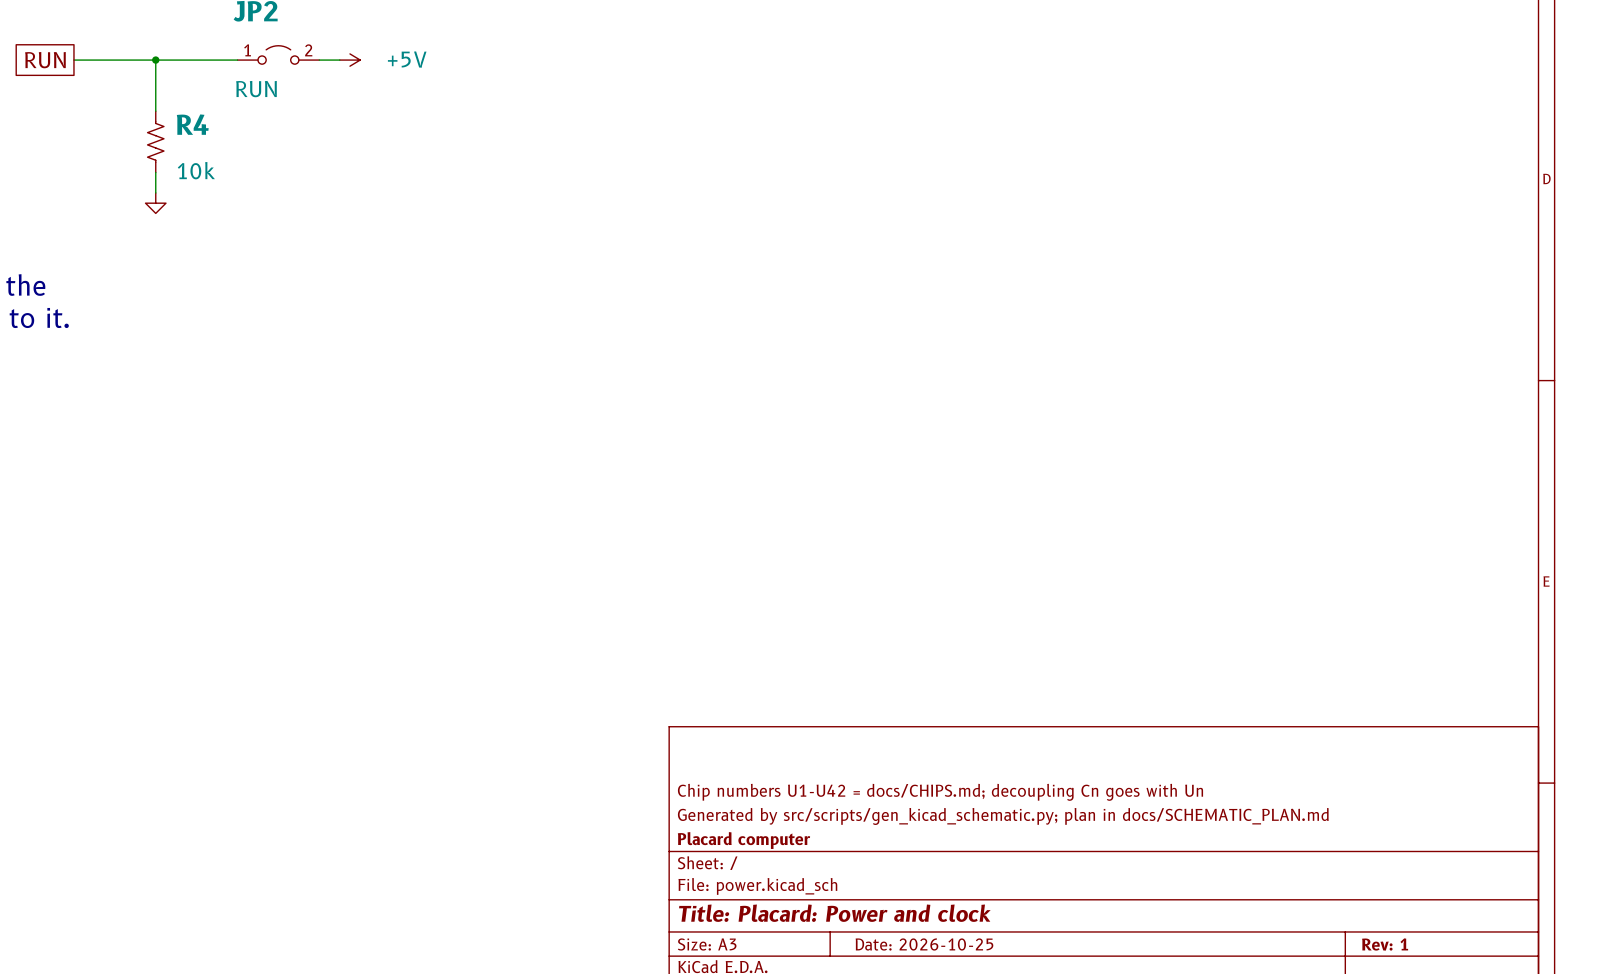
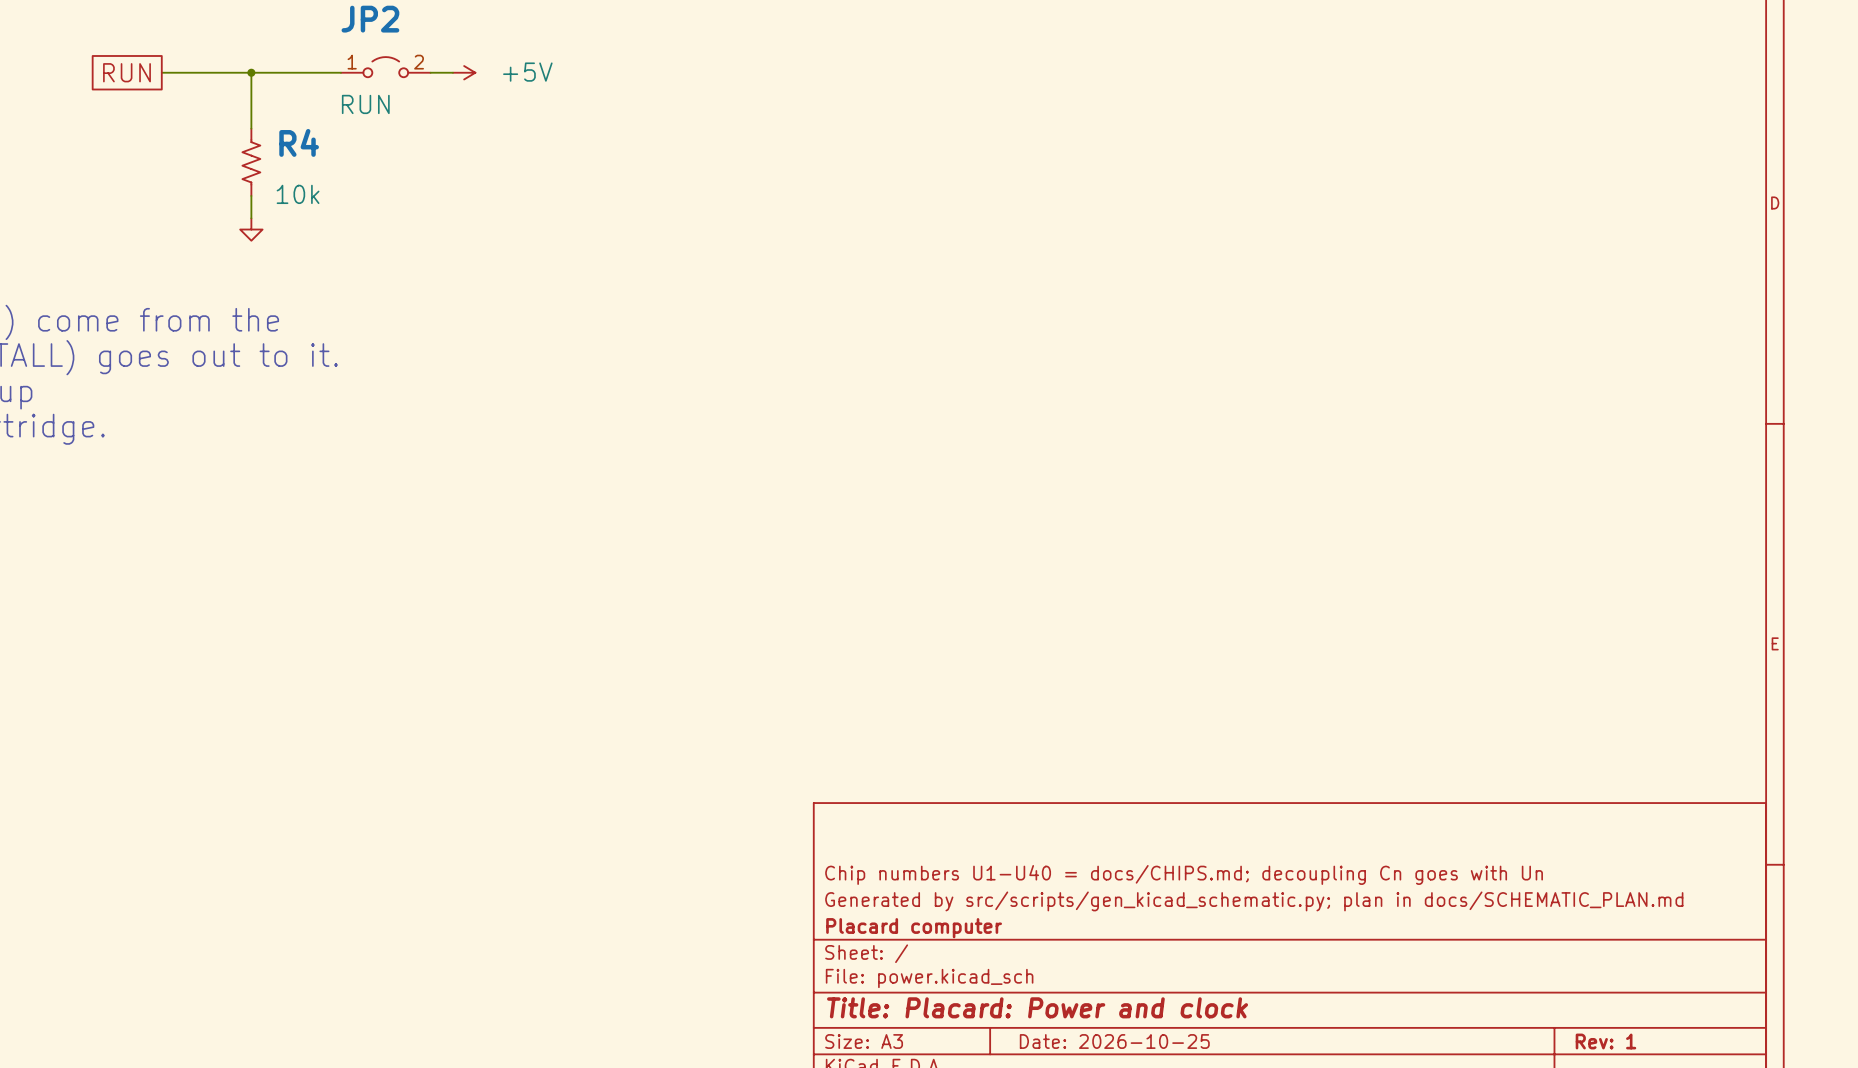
title block: Chip numbers U1-U42 = docs/CHIPS.md; decoupling Cn goes with Un (940, 792) -> Chip numbers U1-U40 = docs/CHIPS.md; decoupling Cn goes with Un (1184, 874)

